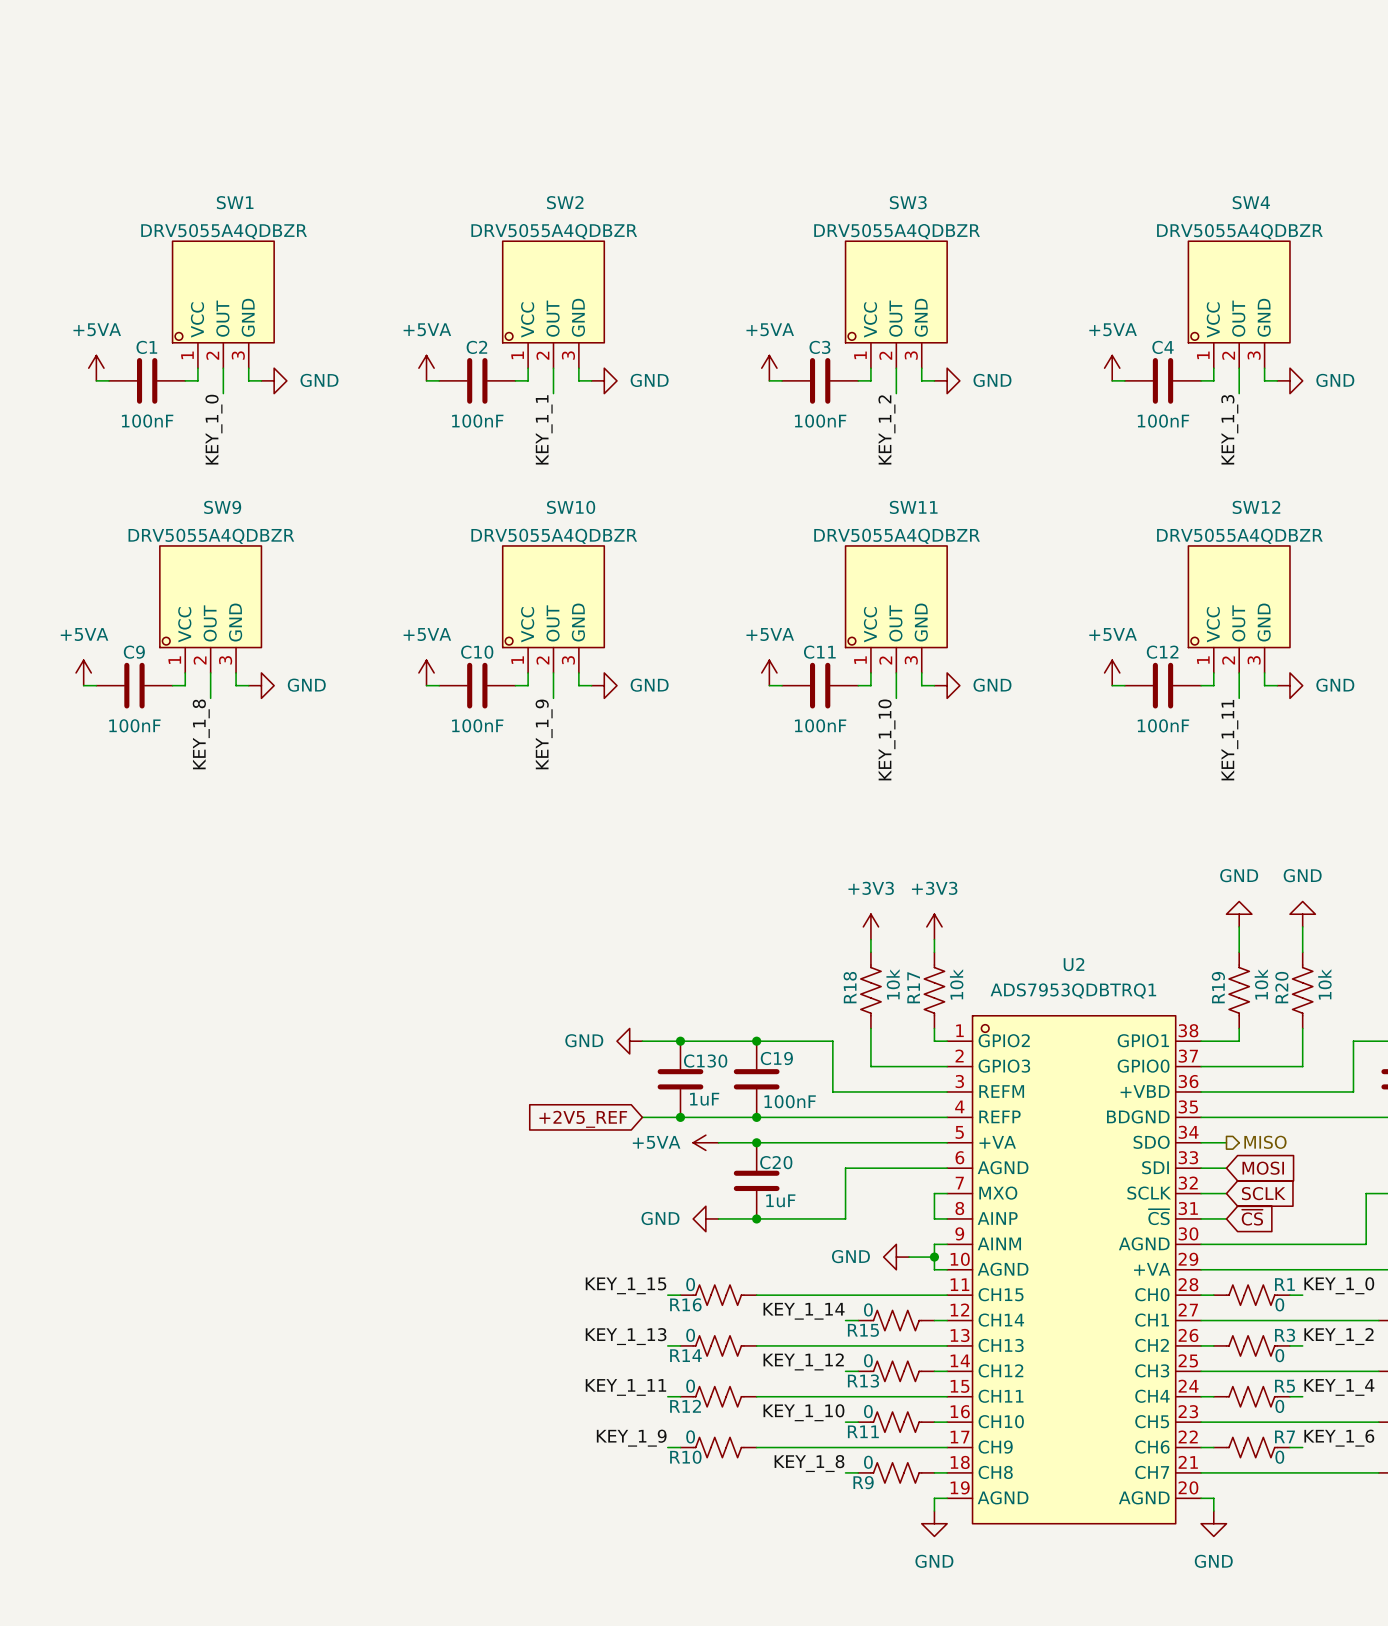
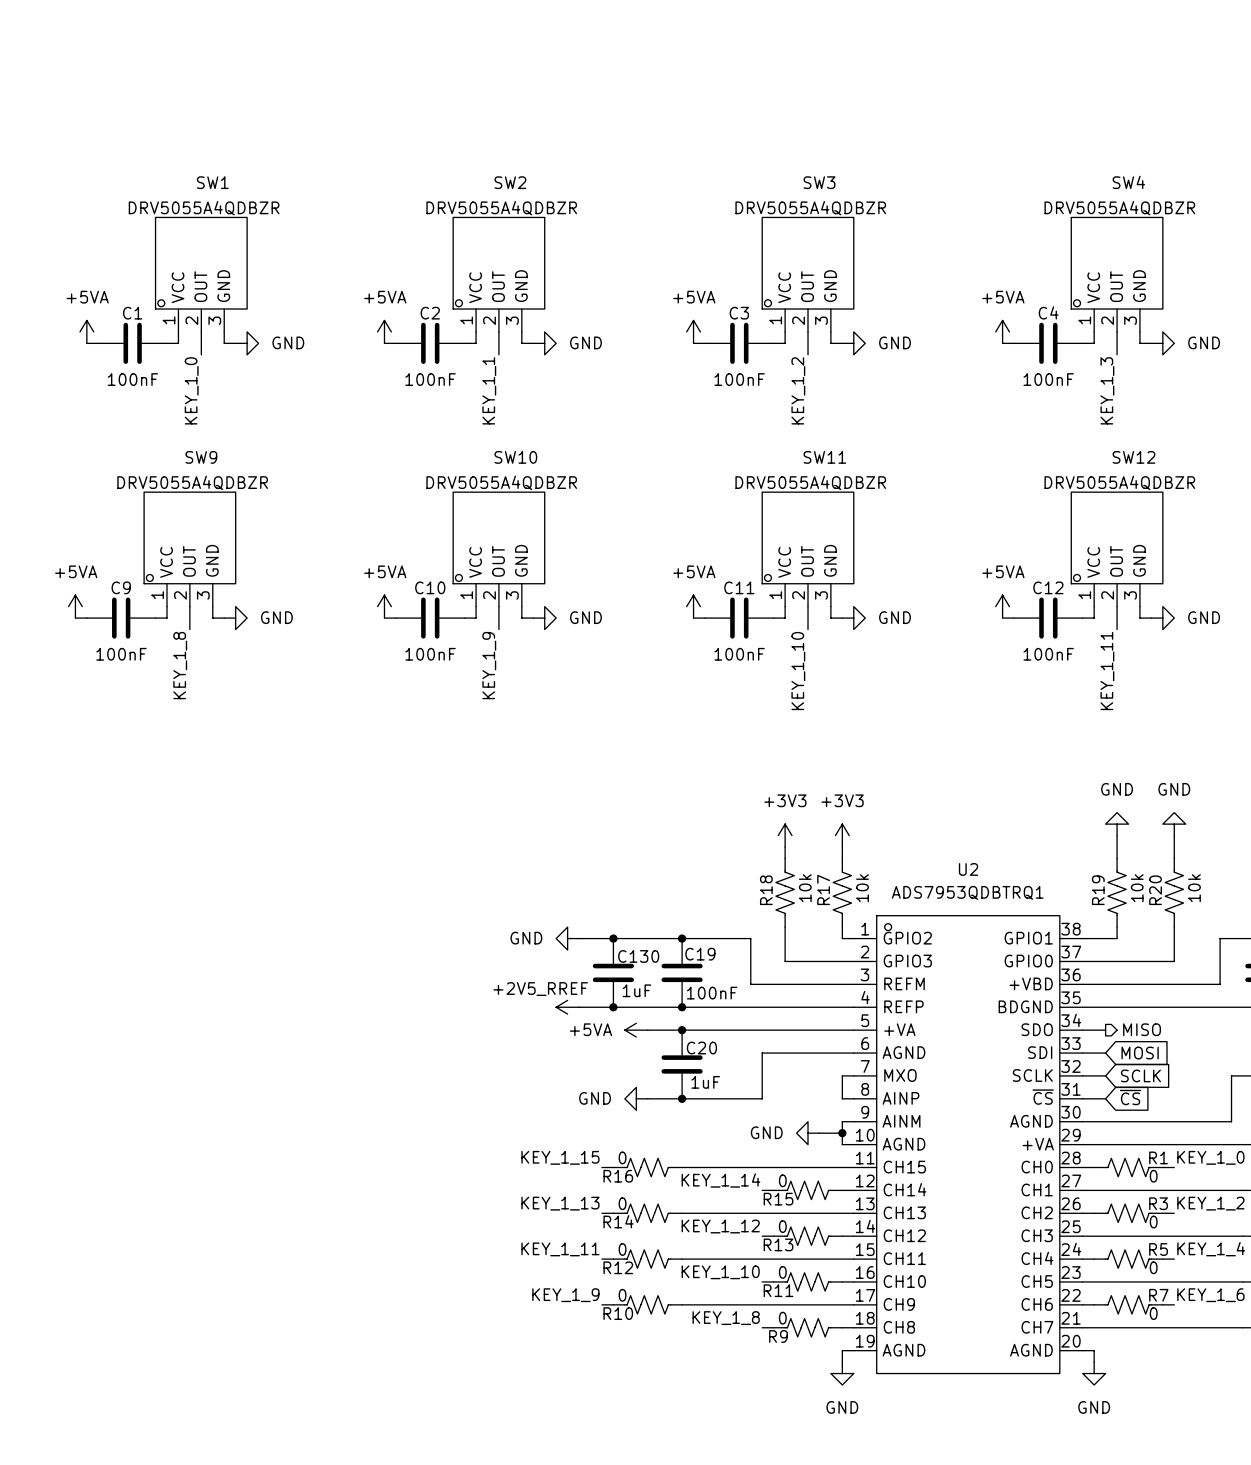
power symbol: none -> +2V5_RREF (567, 1007)
global label: +2V5_REF (583, 1119) -> none

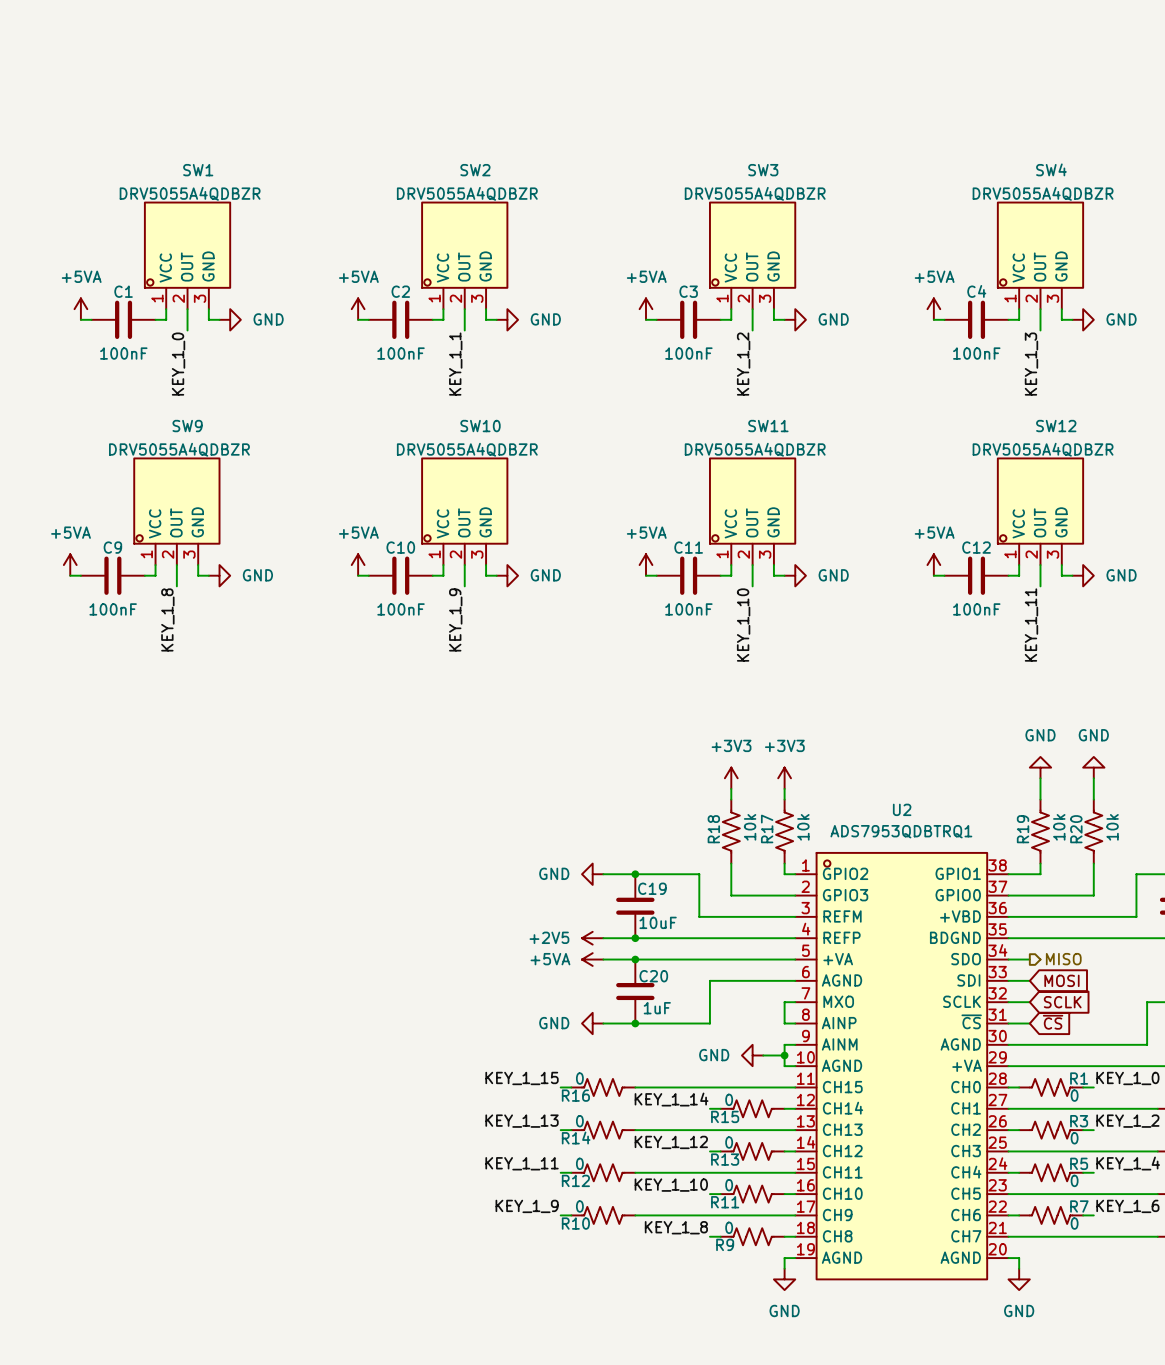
power symbol position: GND (567, 938) -> GND (592, 874)
wire: (579, 938) (647, 938) -> none
junction: (613, 938) -> none
C130: 1uF (613, 972) -> none
C19 value: 100nF (712, 993) -> 10uF (658, 922)
power symbol: +2V5_RREF (567, 1007) -> none
wire: (579, 1007) (647, 1007) -> none
junction: (613, 1007) -> none
power symbol: none -> +2V5 (592, 938)

